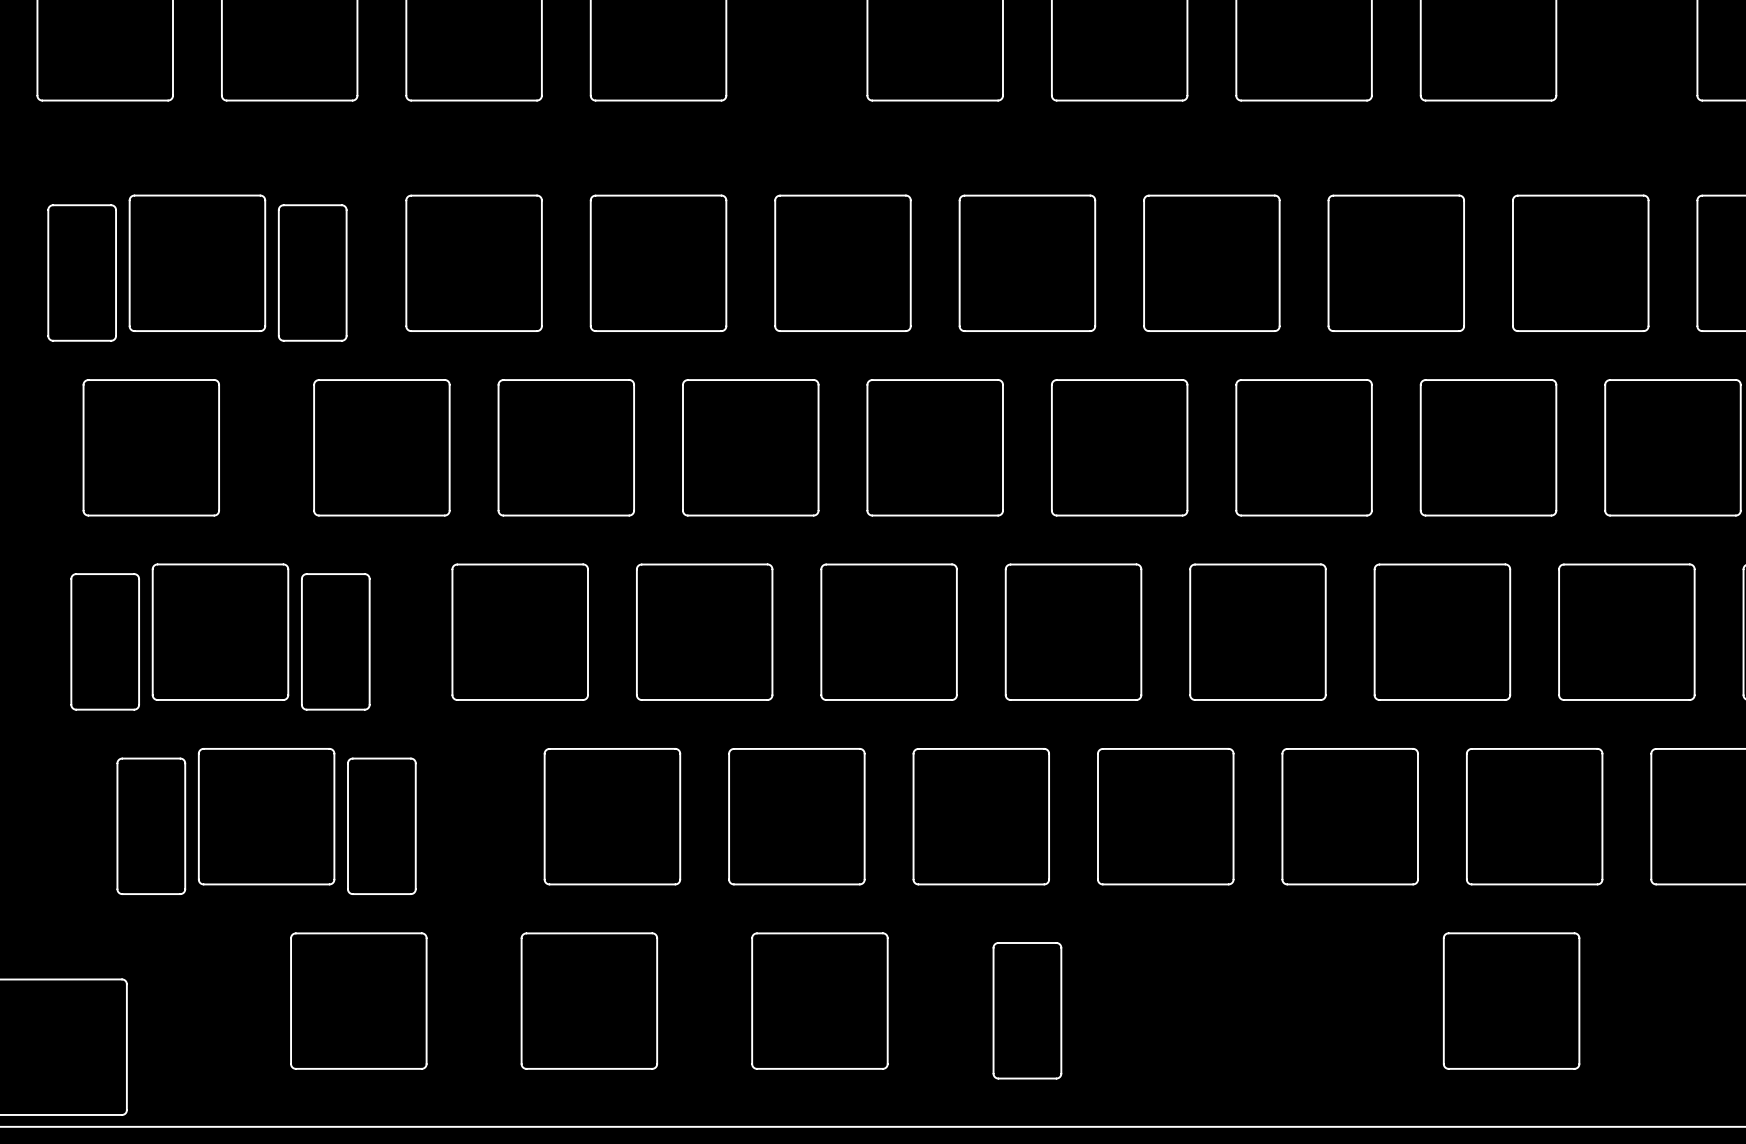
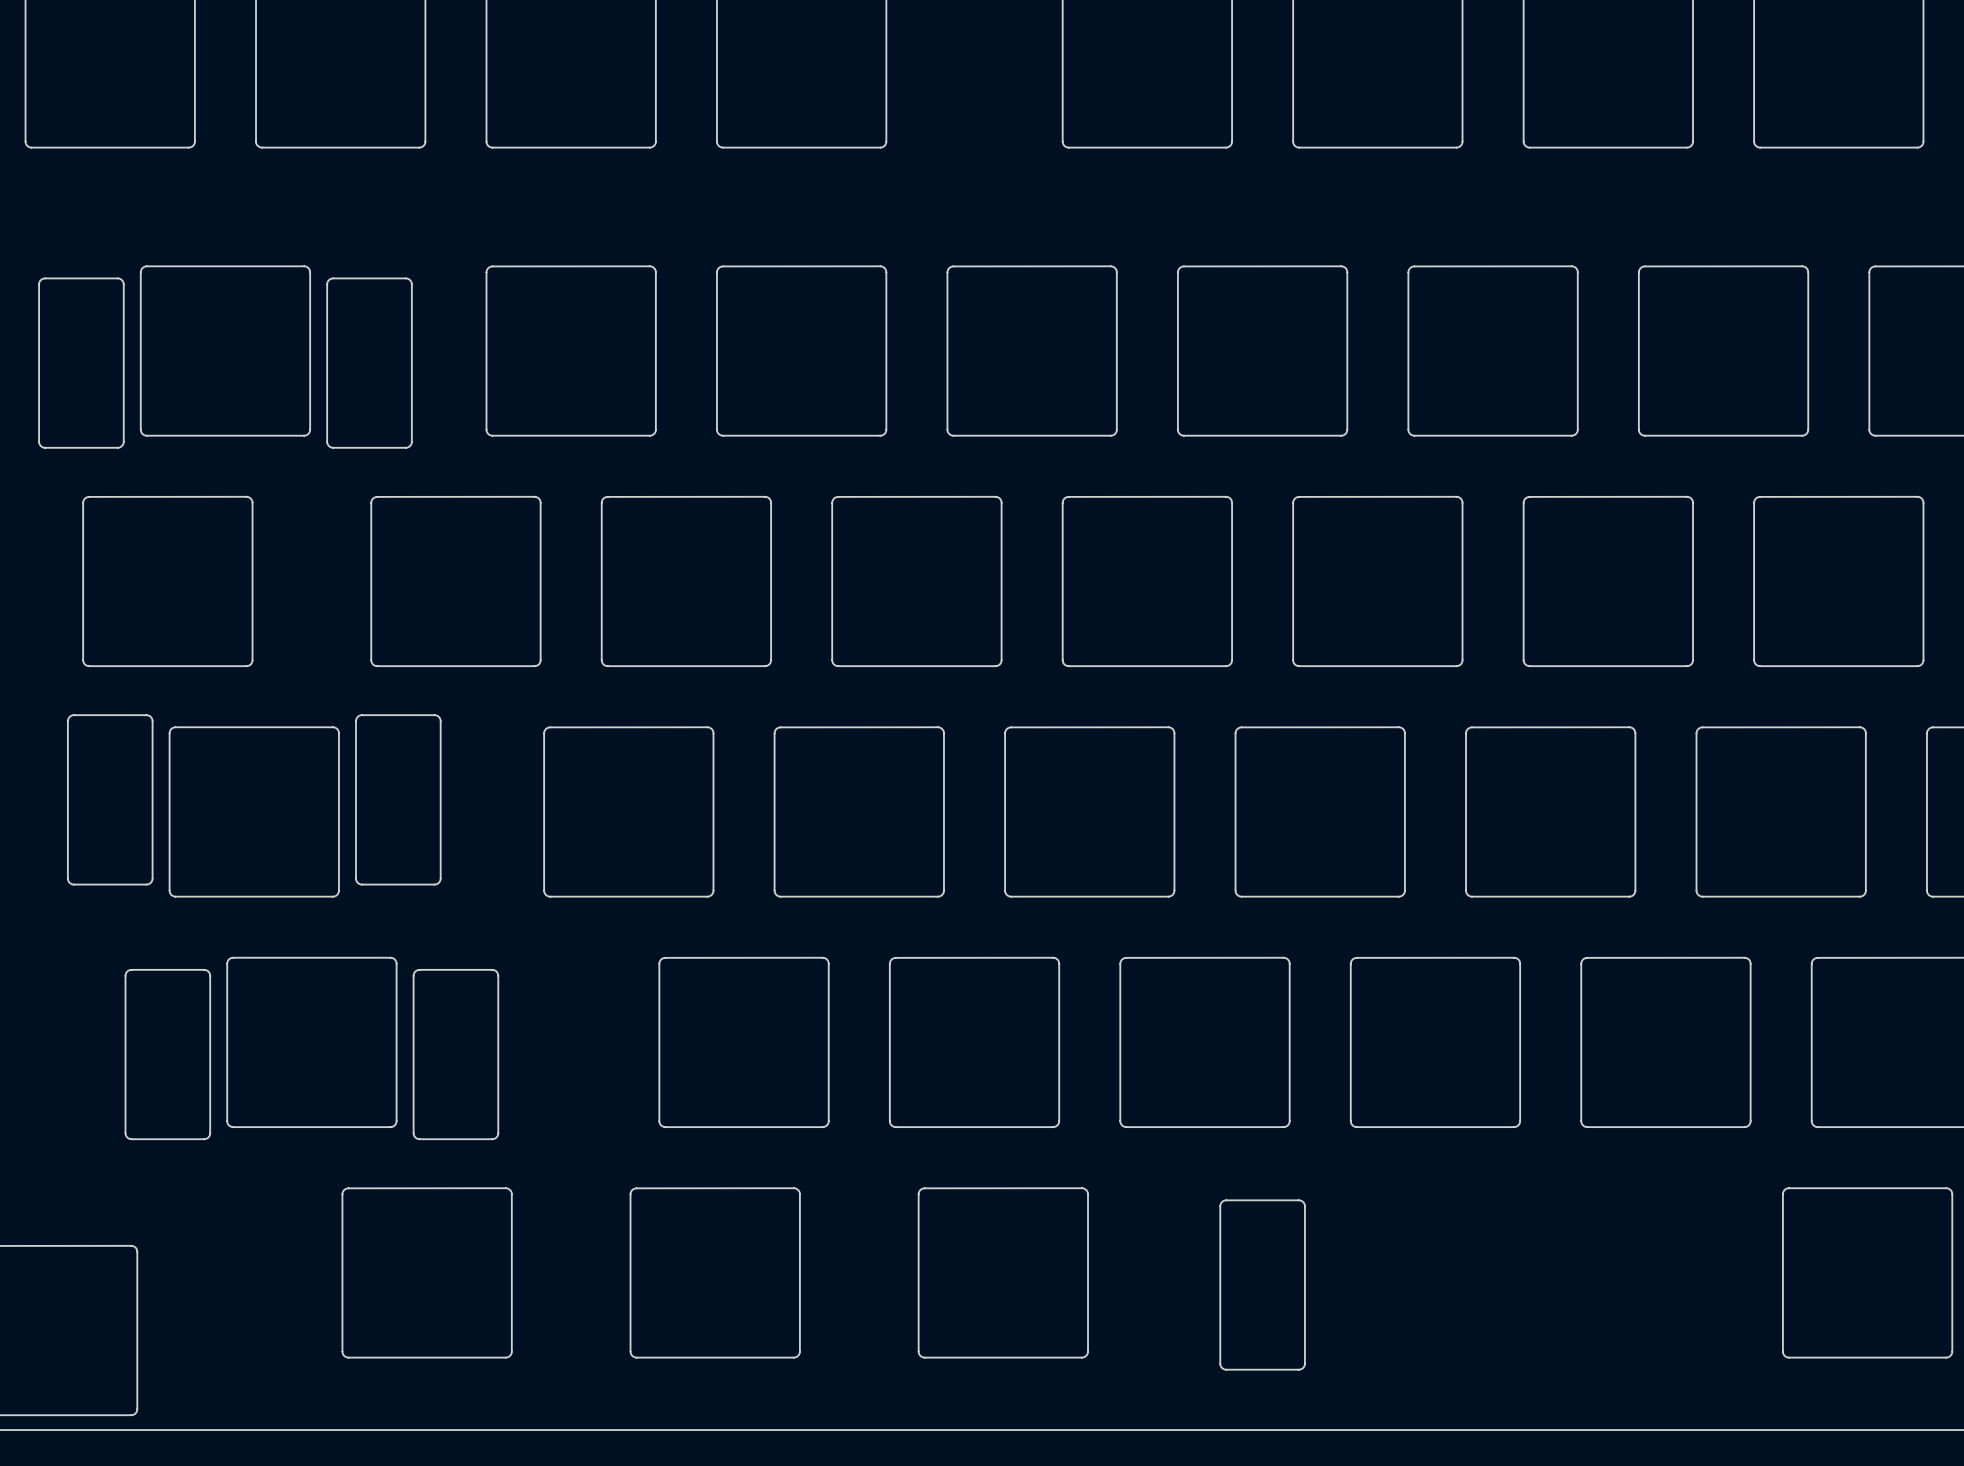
drawing shape: [71, 564, 370, 710] -> [67, 715, 441, 897]

